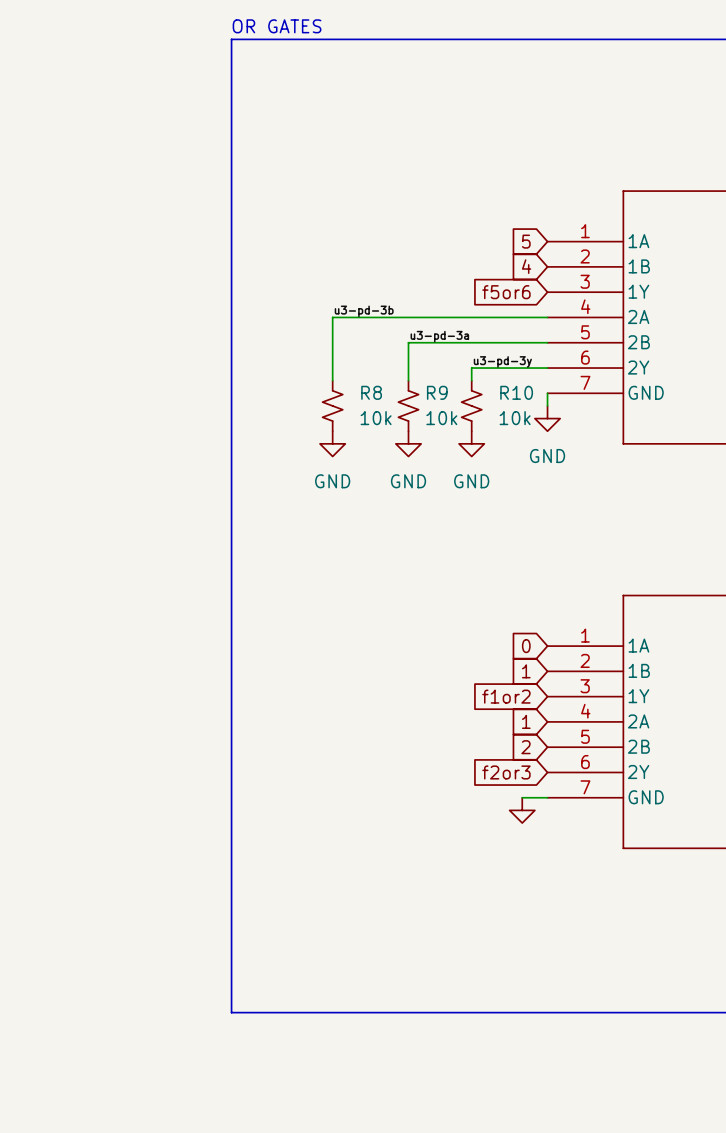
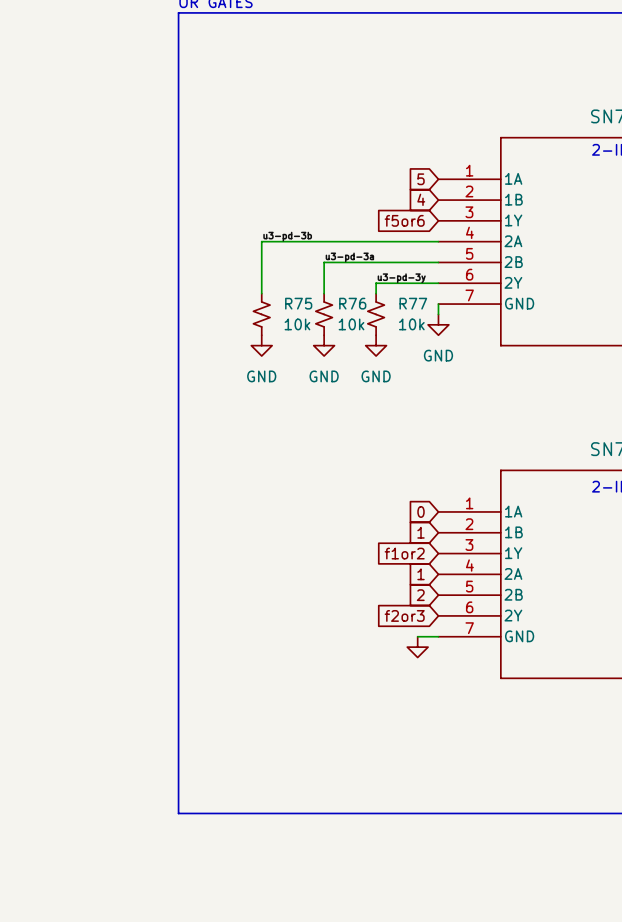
R8 name: R8 (371, 392) -> R75 (298, 303)
R9 name: R9 (437, 392) -> R76 (352, 303)
R10 name: R10 (516, 392) -> R77 (413, 303)

